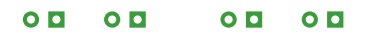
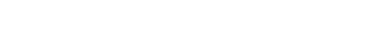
part: (43, 19) -> none
part: (124, 19) -> none
part: (241, 19) -> none
part: (322, 19) -> none

